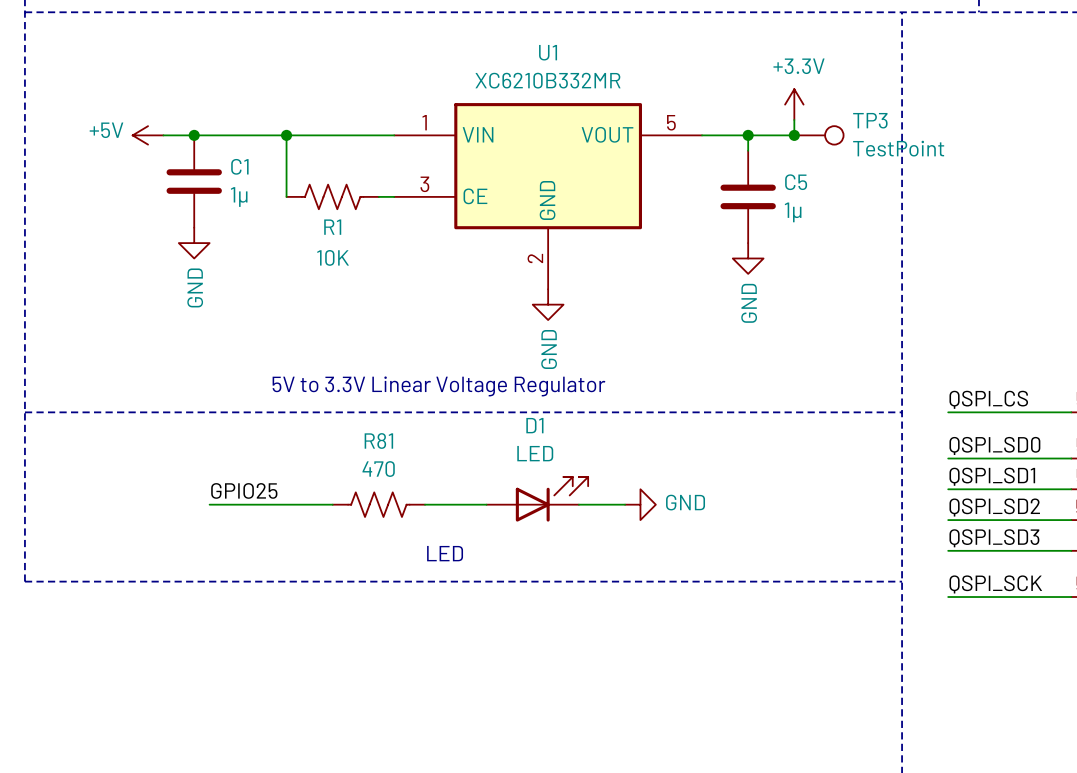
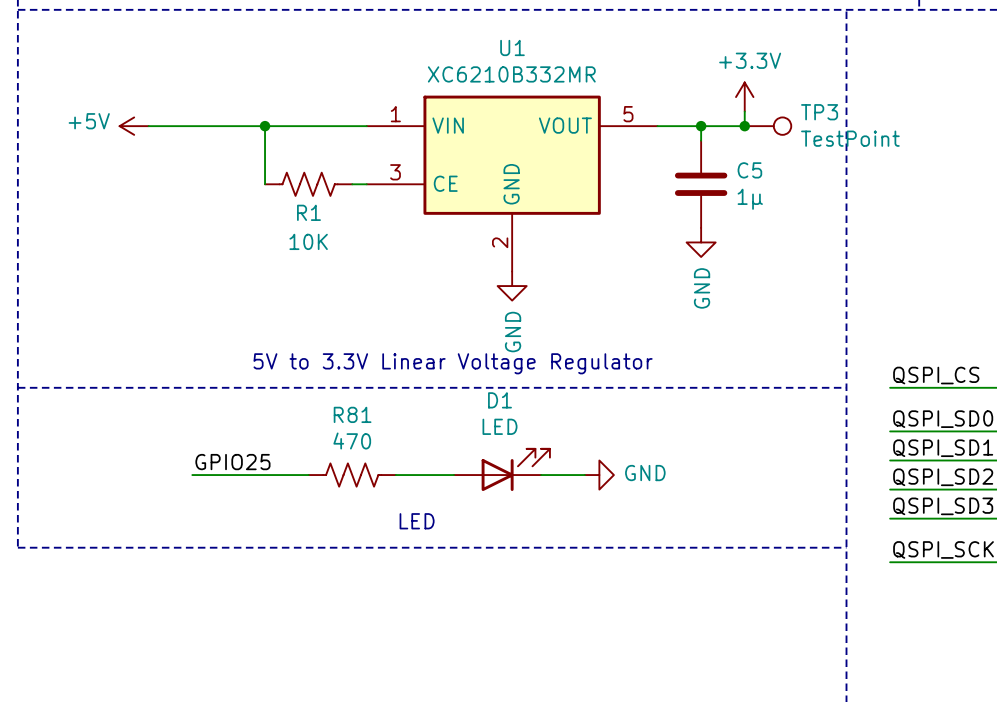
junction: (194, 135) -> none
C1: 1μ (194, 181) -> none
power symbol: GND (194, 243) -> none

